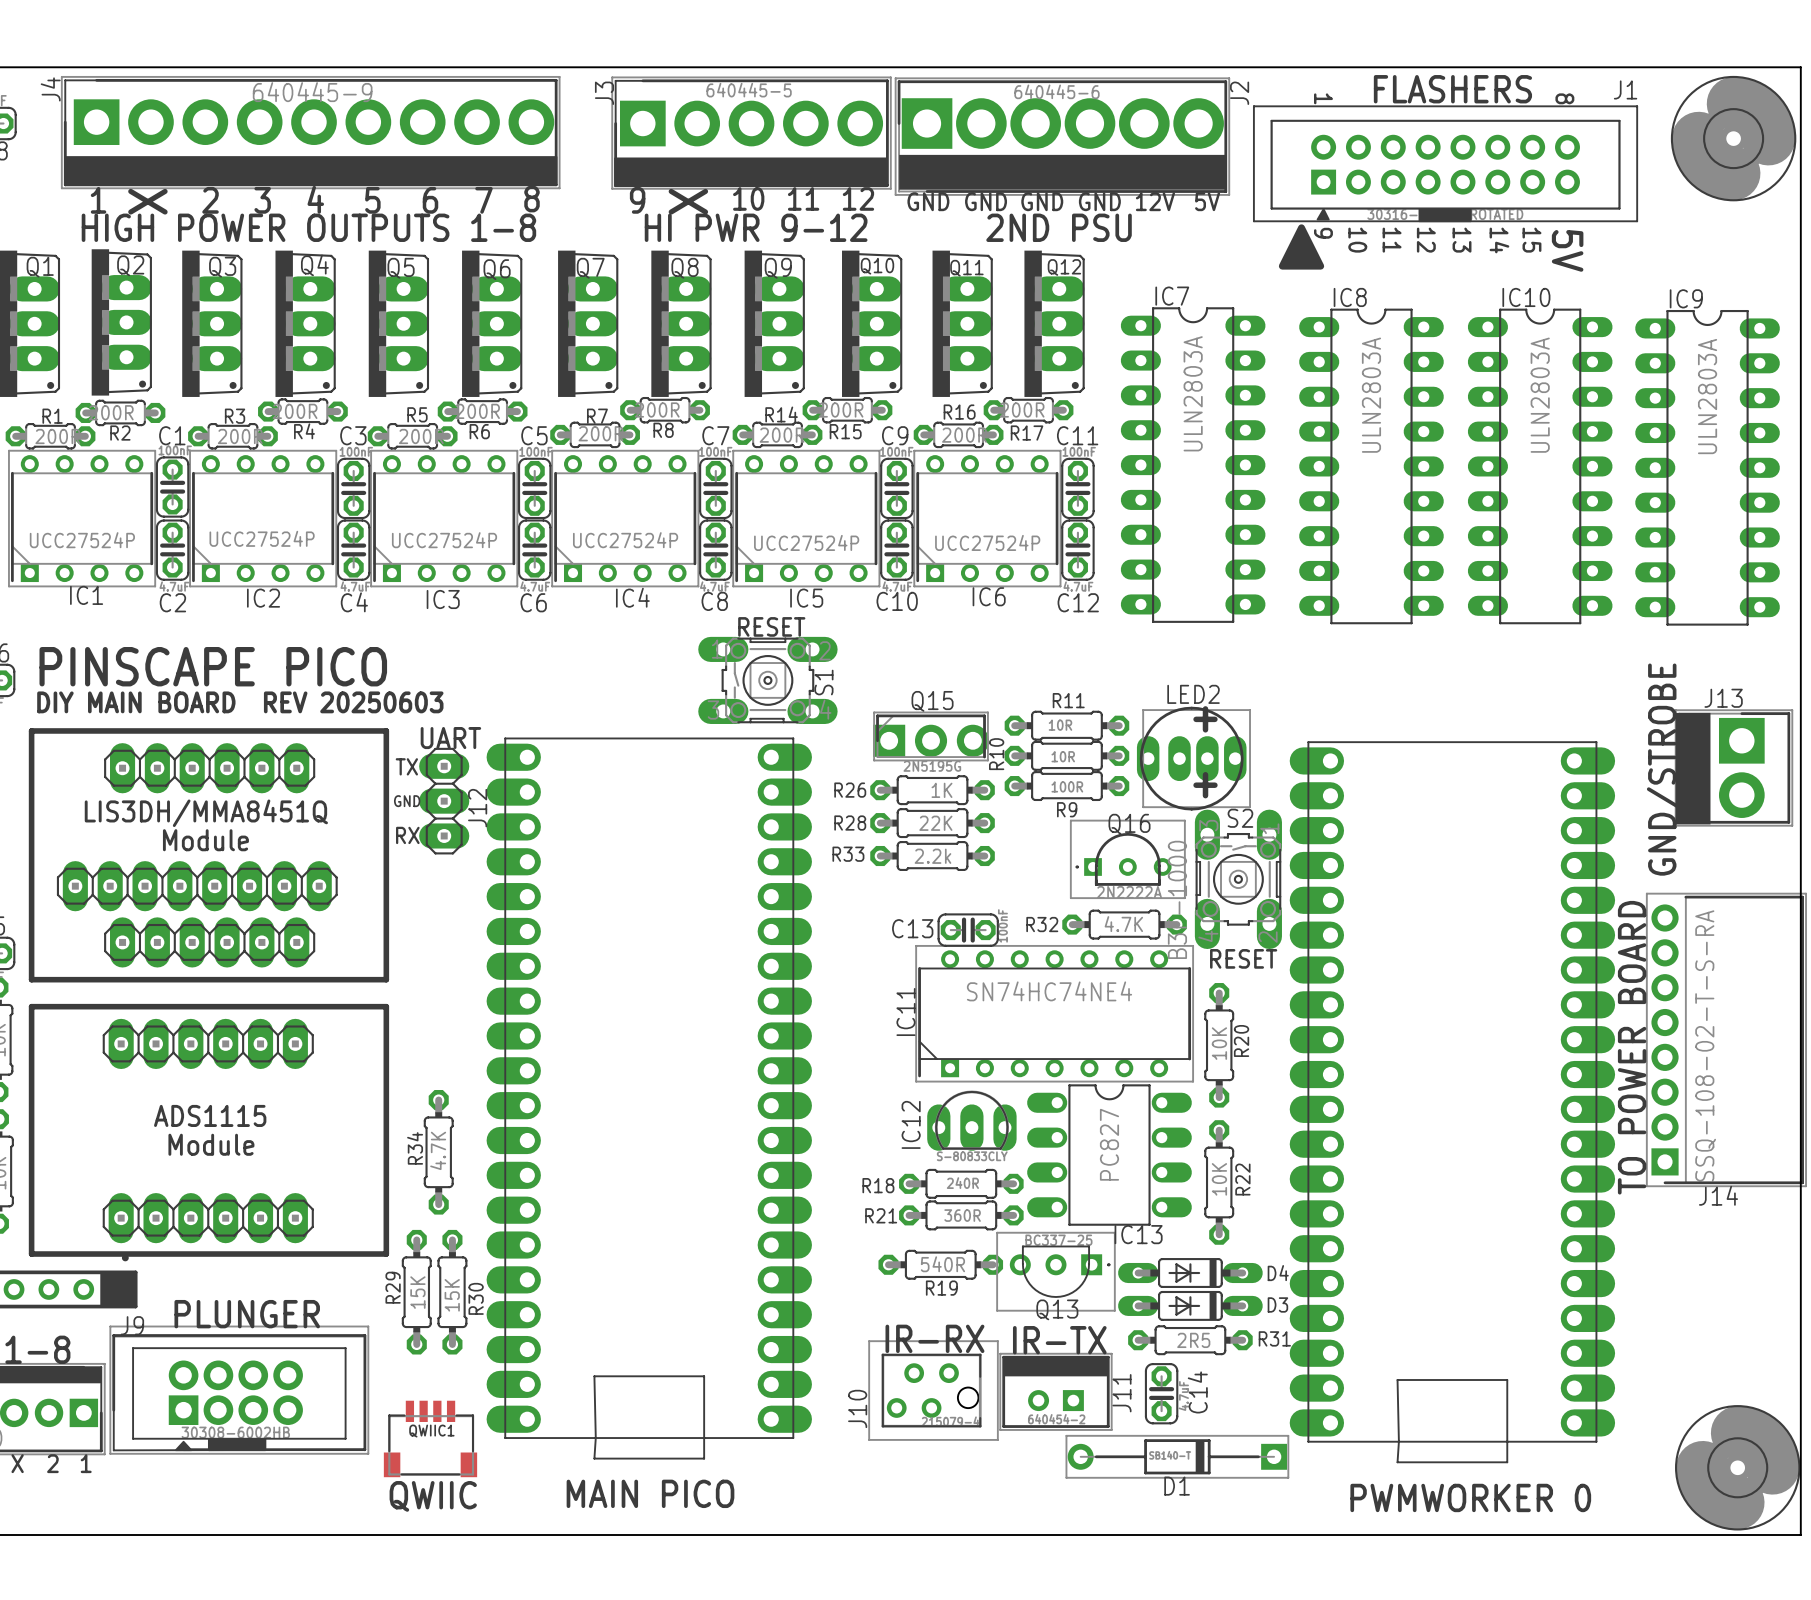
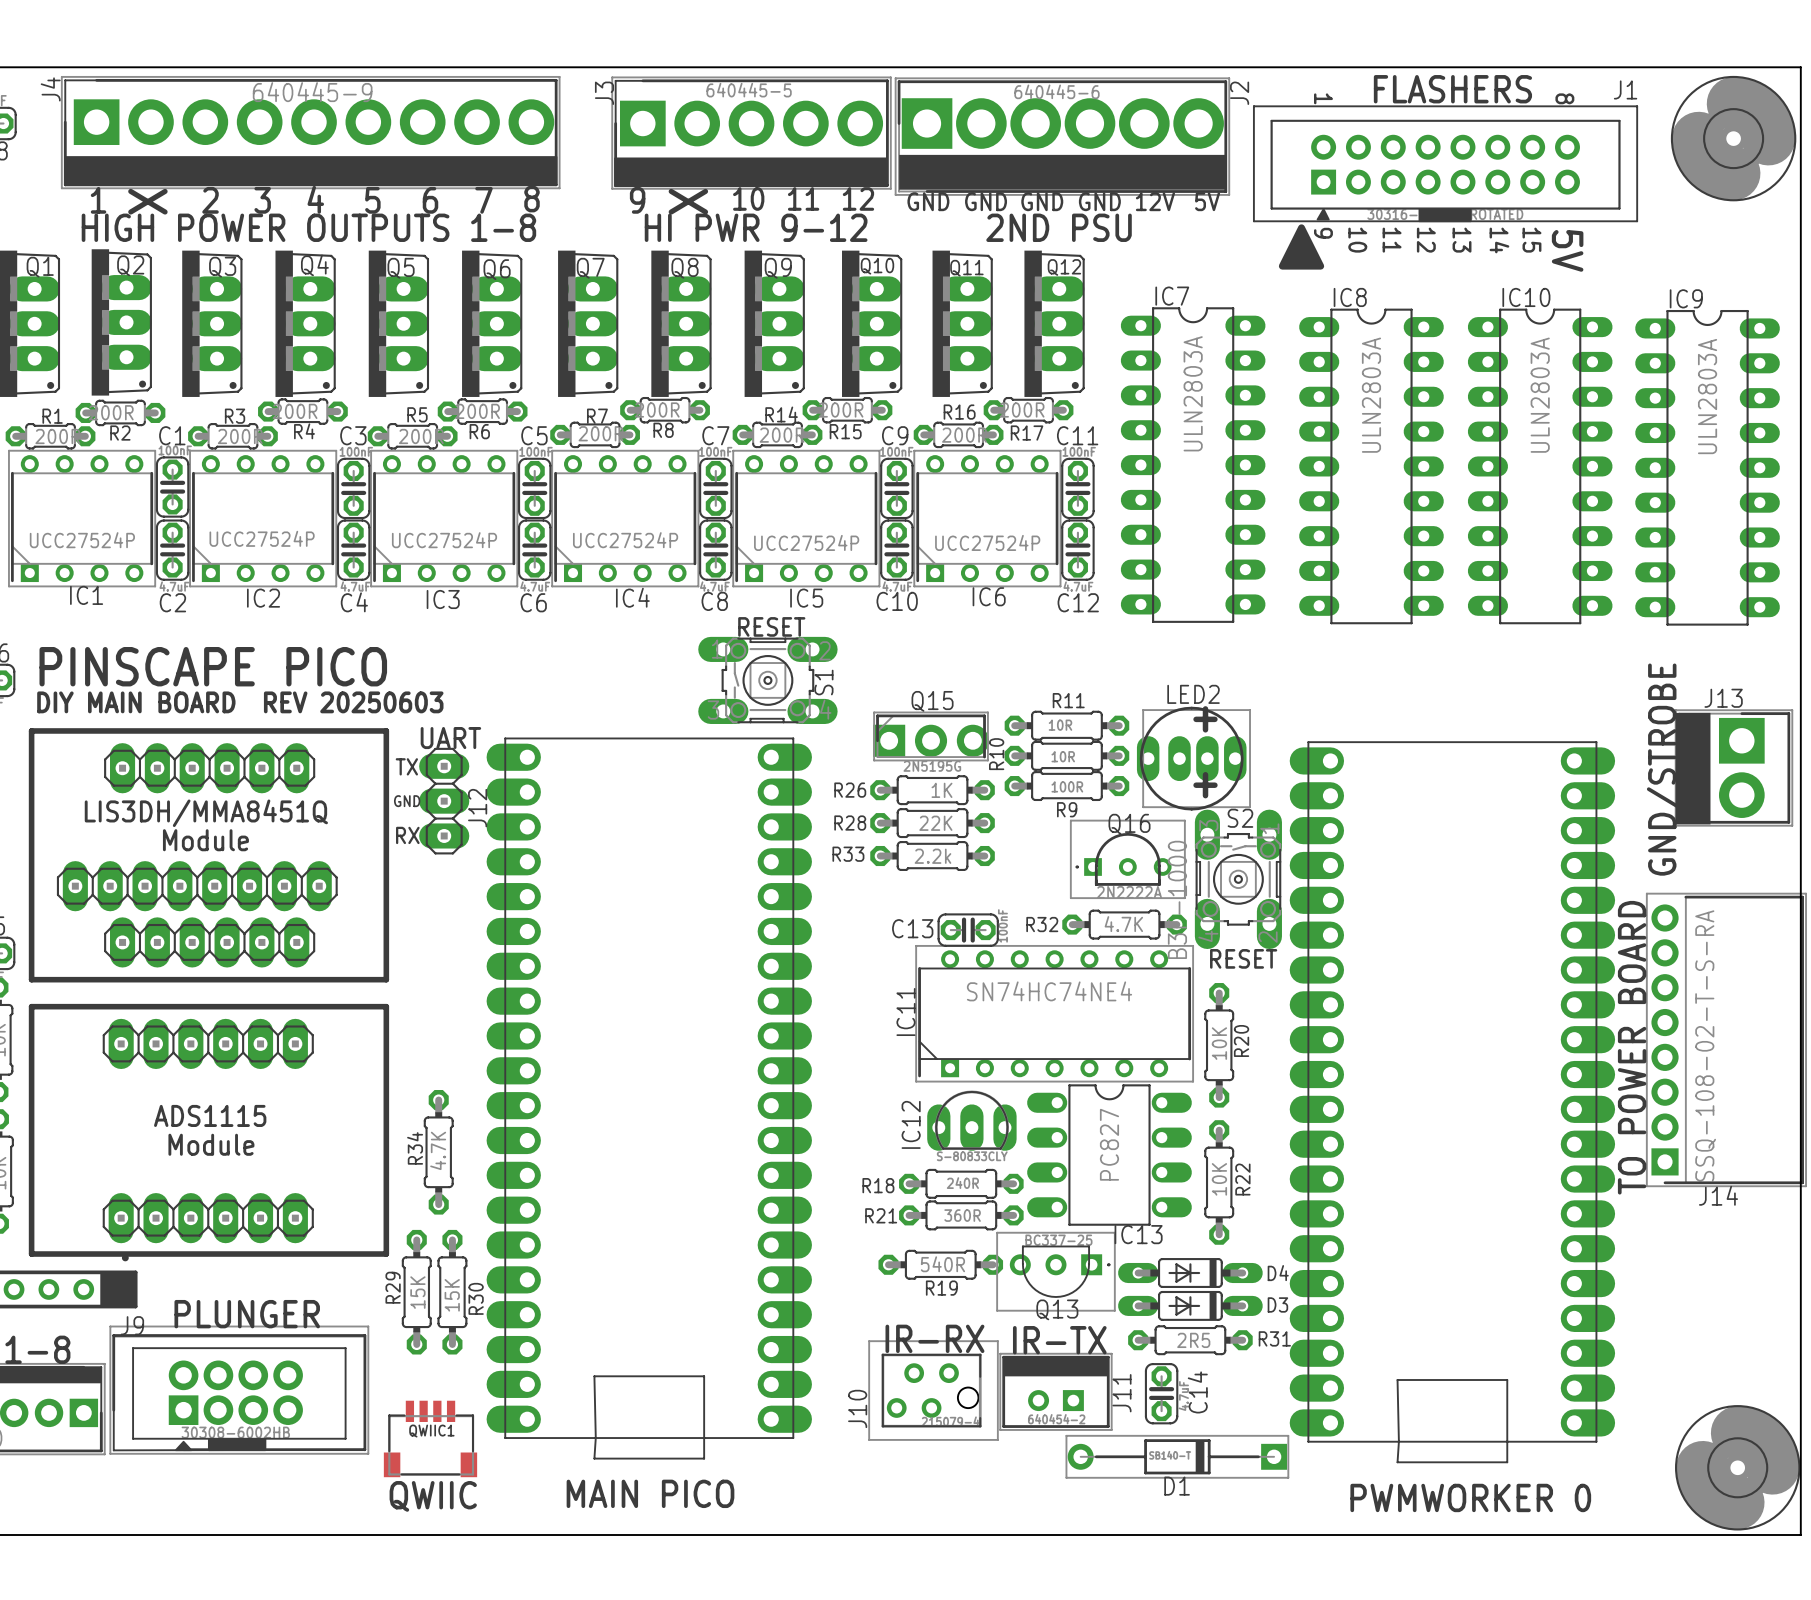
text: X (17, 1463) -> none
text: 2 (52, 1463) -> none
text: 1 (86, 1463) -> none

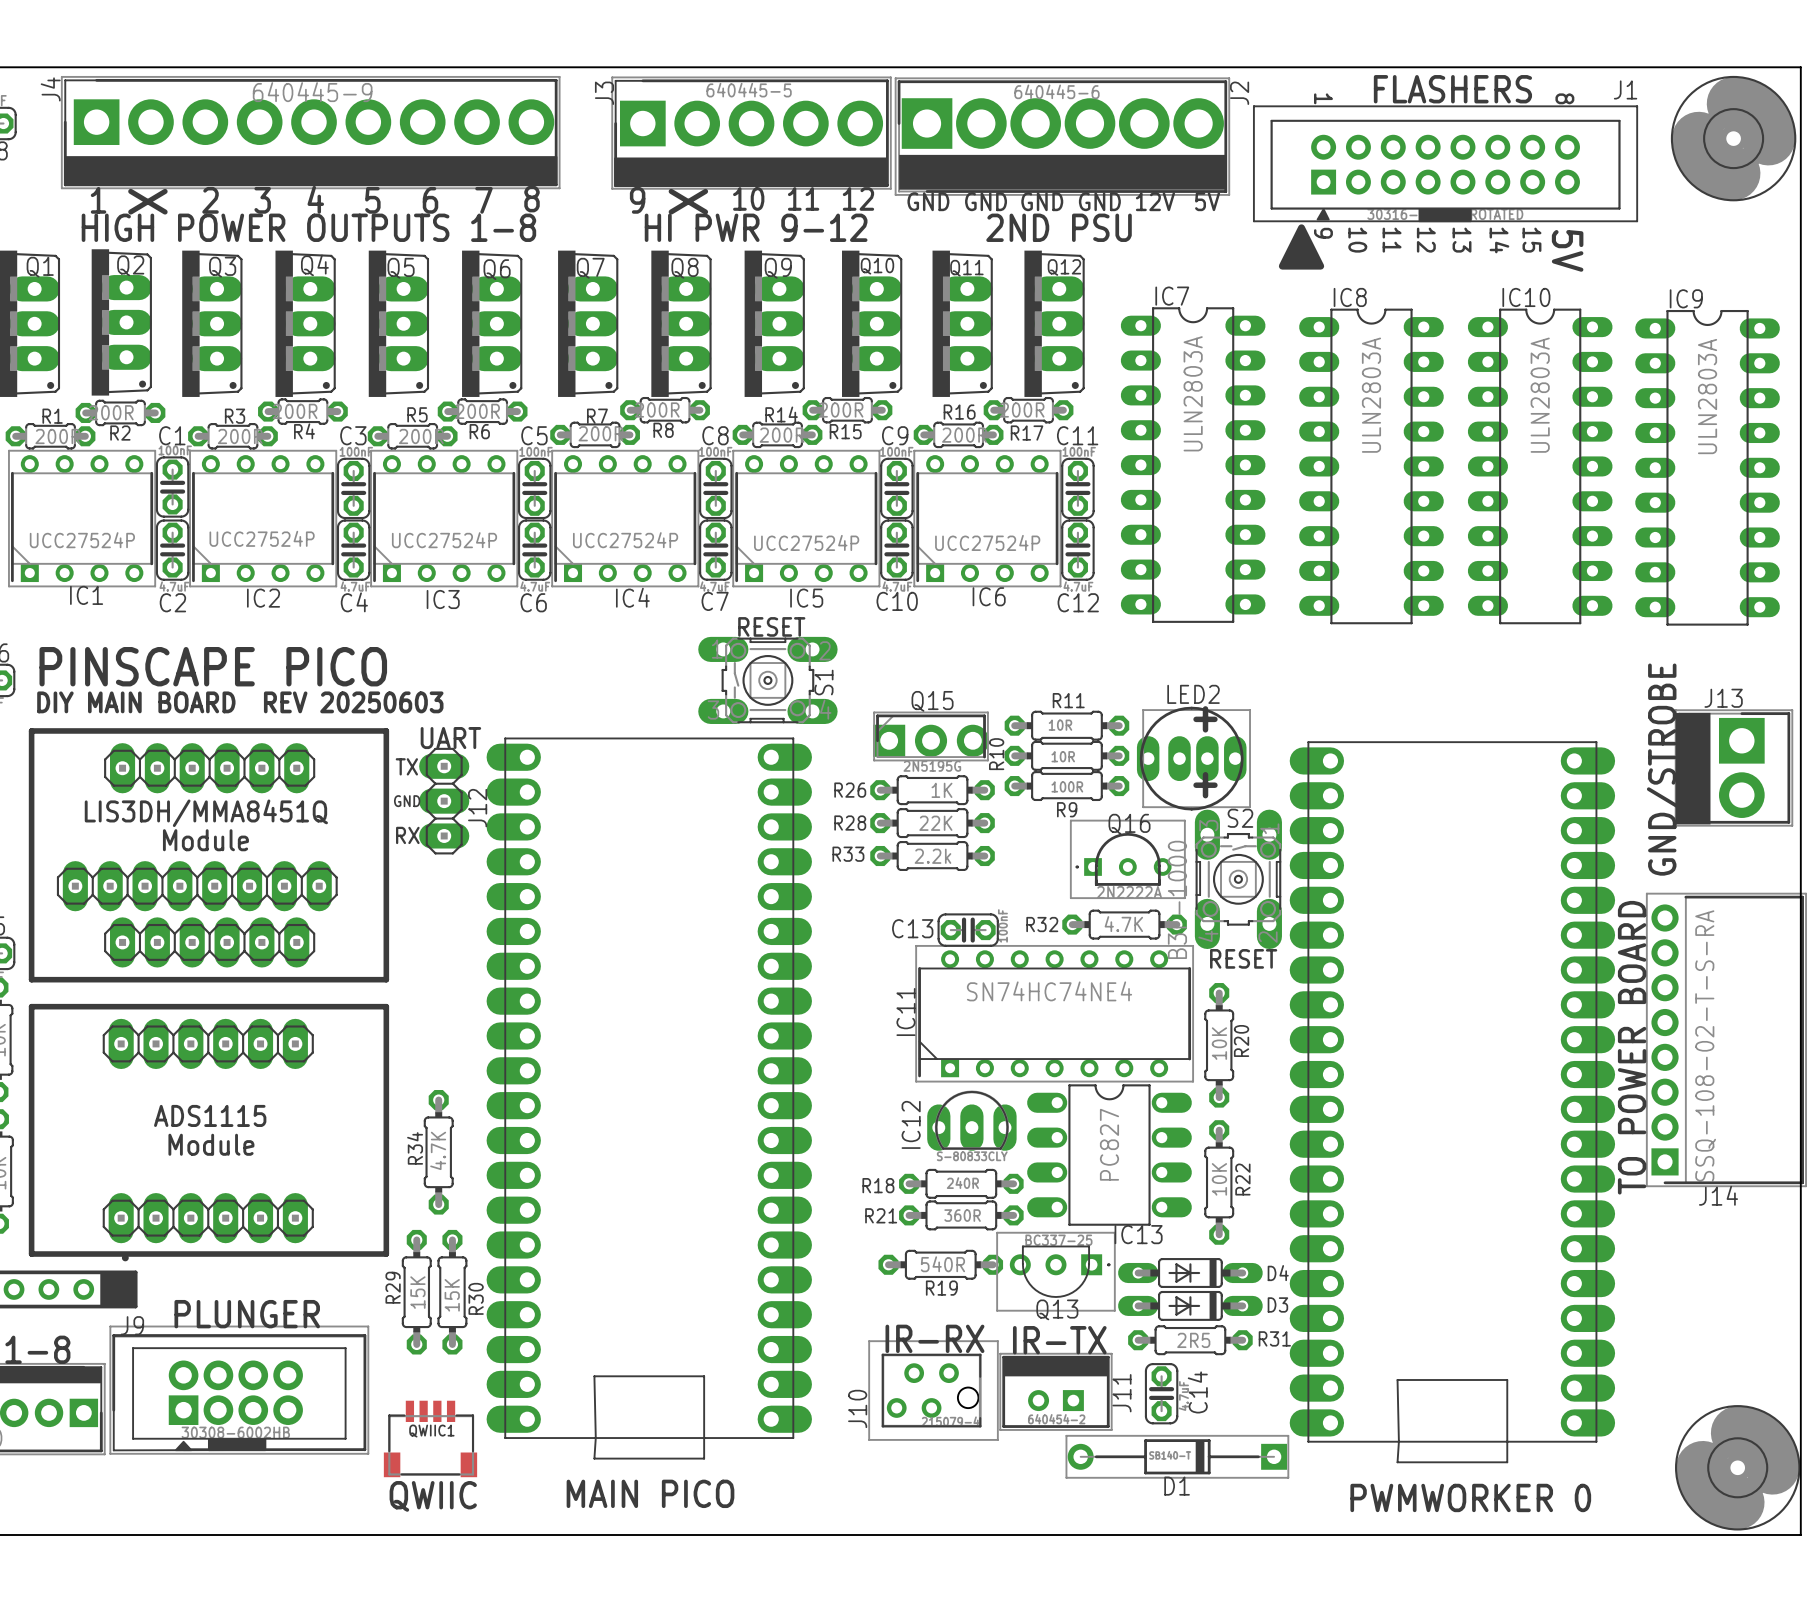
C7 name: C7 (715, 435) -> C8 (715, 435)
C8 name: C8 (714, 601) -> C7 (715, 601)

